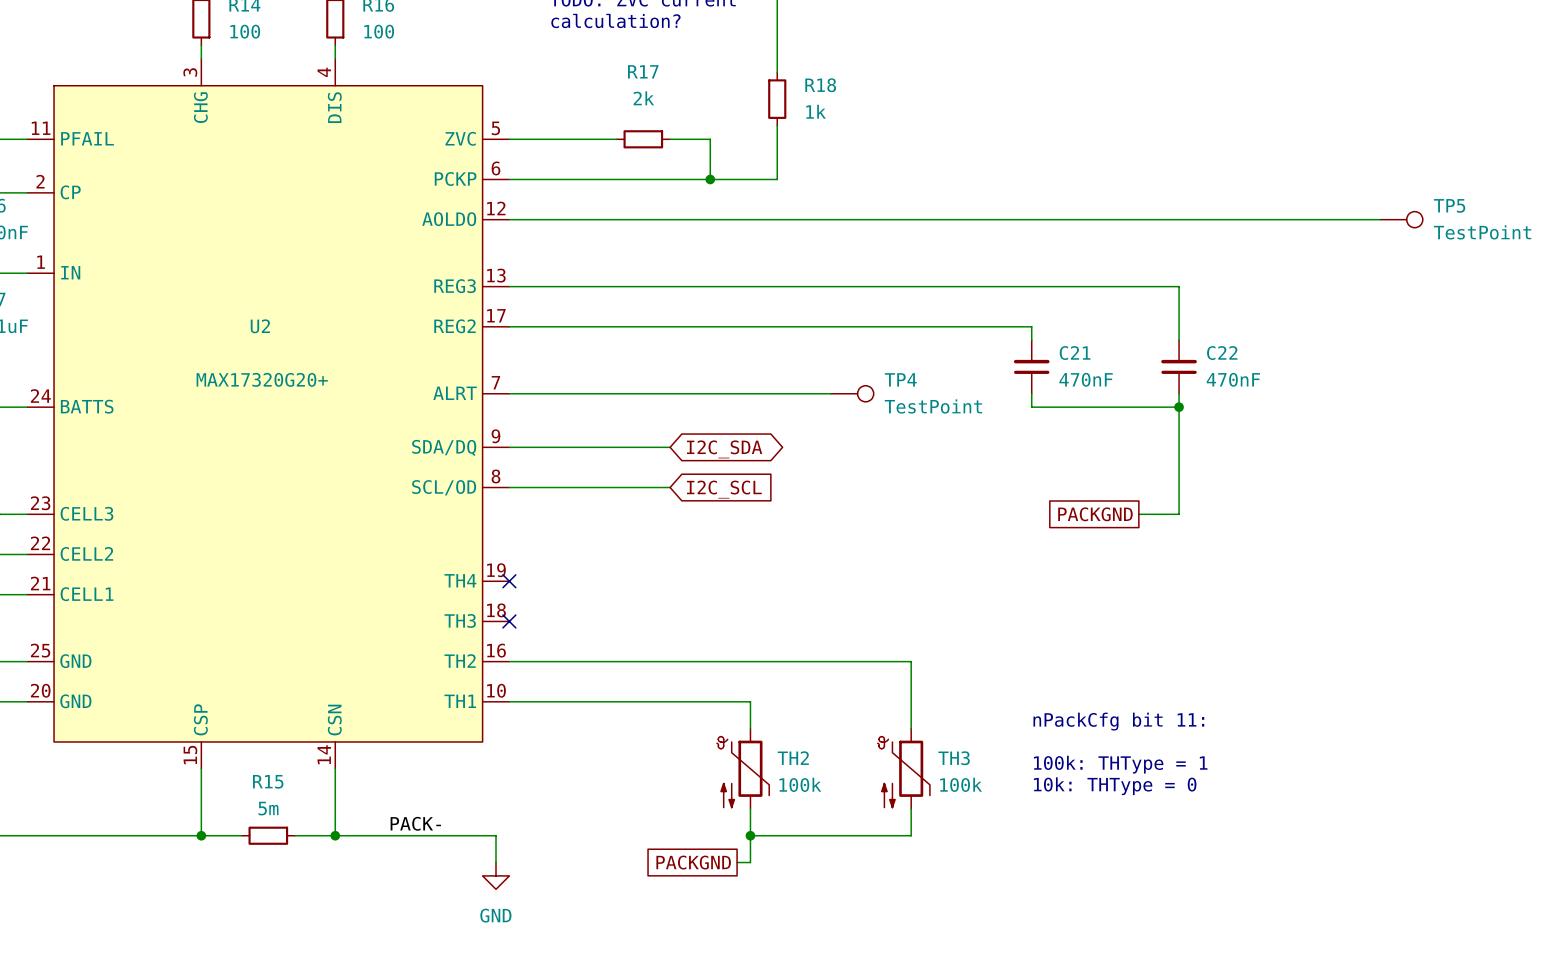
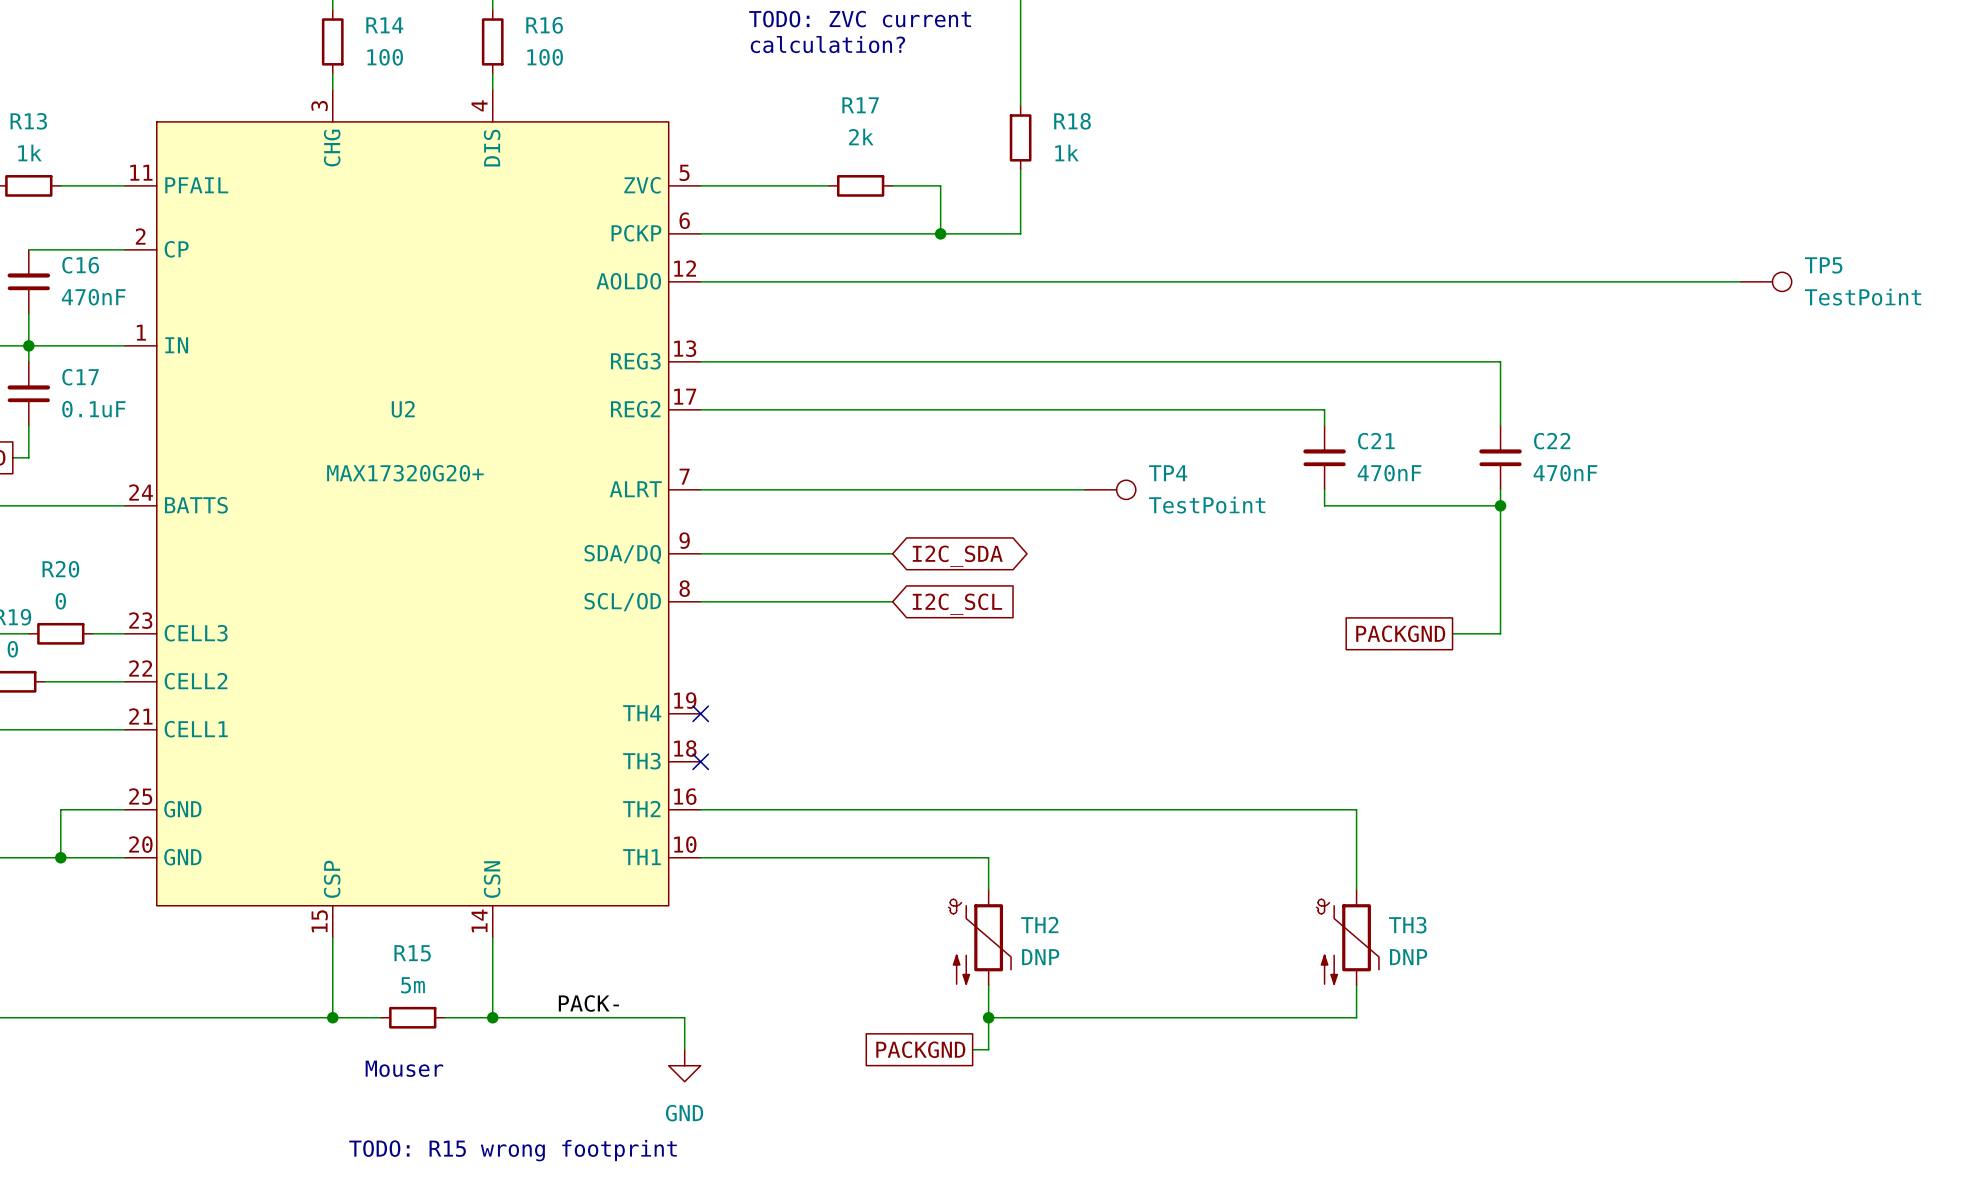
wire: (911, 661) (911, 728) -> (1180, 809) (1356, 809) (1356, 889)
text: nPackCfg bit 11: (1118, 721) -> none
text: 100k: THType = 1 (1120, 764) -> none
TH3 position: (903, 768) -> (1347, 937)
TH2 value: 100k (800, 784) -> DNP (1040, 957)
TH3 value: 100k (961, 784) -> DNP (1408, 957)
text: 10k: THType = 0 (1115, 786) -> none
wire: (911, 808) (911, 835) -> (1356, 985) (1356, 1017) (1180, 1017)
text: none -> Mouser (404, 1068)
text: none -> TODO: R15 wrong footprint (513, 1150)

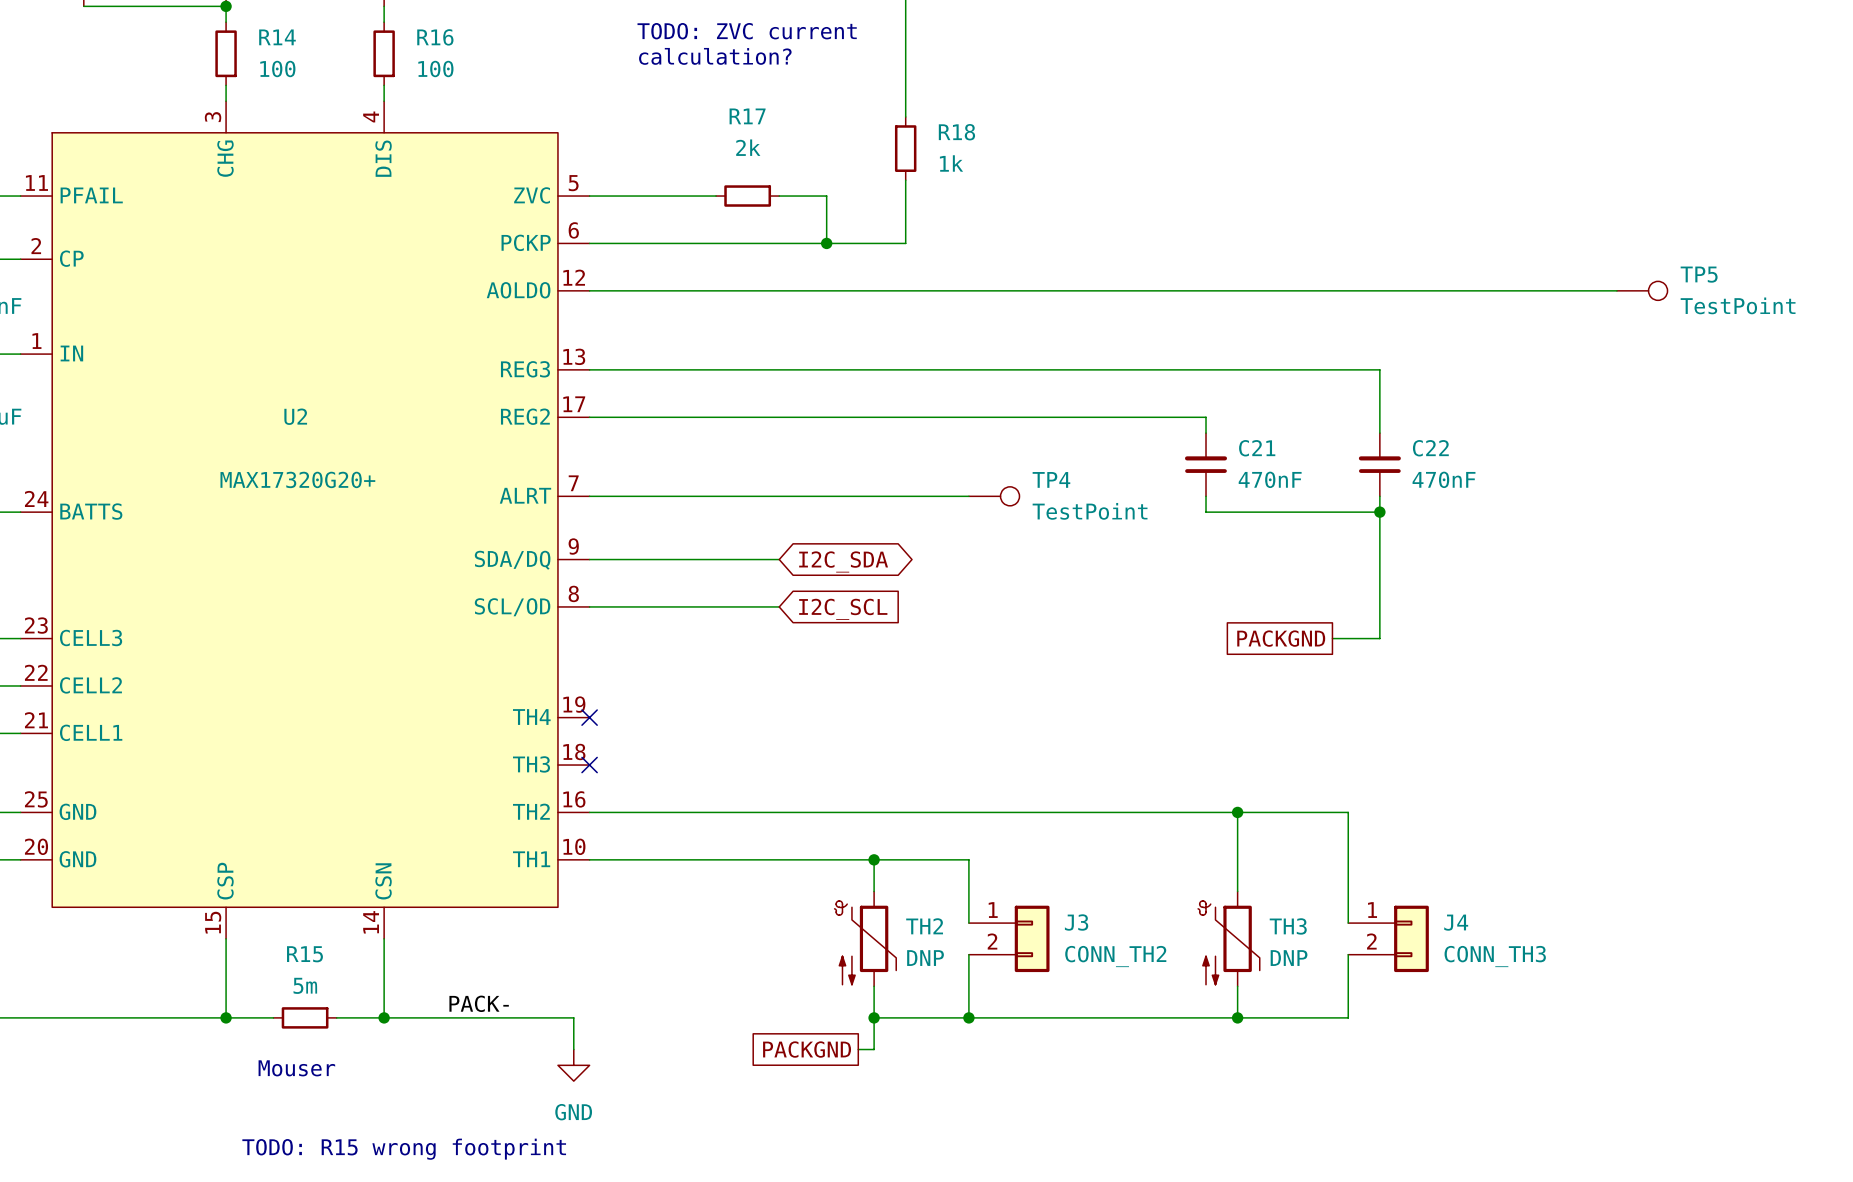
wire: none -> (1237, 812) (1348, 812) (1348, 923)
junction: none -> (1237, 812)
wire: none -> (874, 859) (968, 859) (968, 923)
junction: none -> (874, 859)
J3: none -> CONN_TH2 (1009, 938)
J4: none -> CONN_TH3 (1388, 938)
wire: none -> (968, 954) (968, 1017)
wire: none -> (1348, 954) (1348, 1017) (1237, 1017)
junction: none -> (968, 1017)
junction: none -> (1237, 1017)

